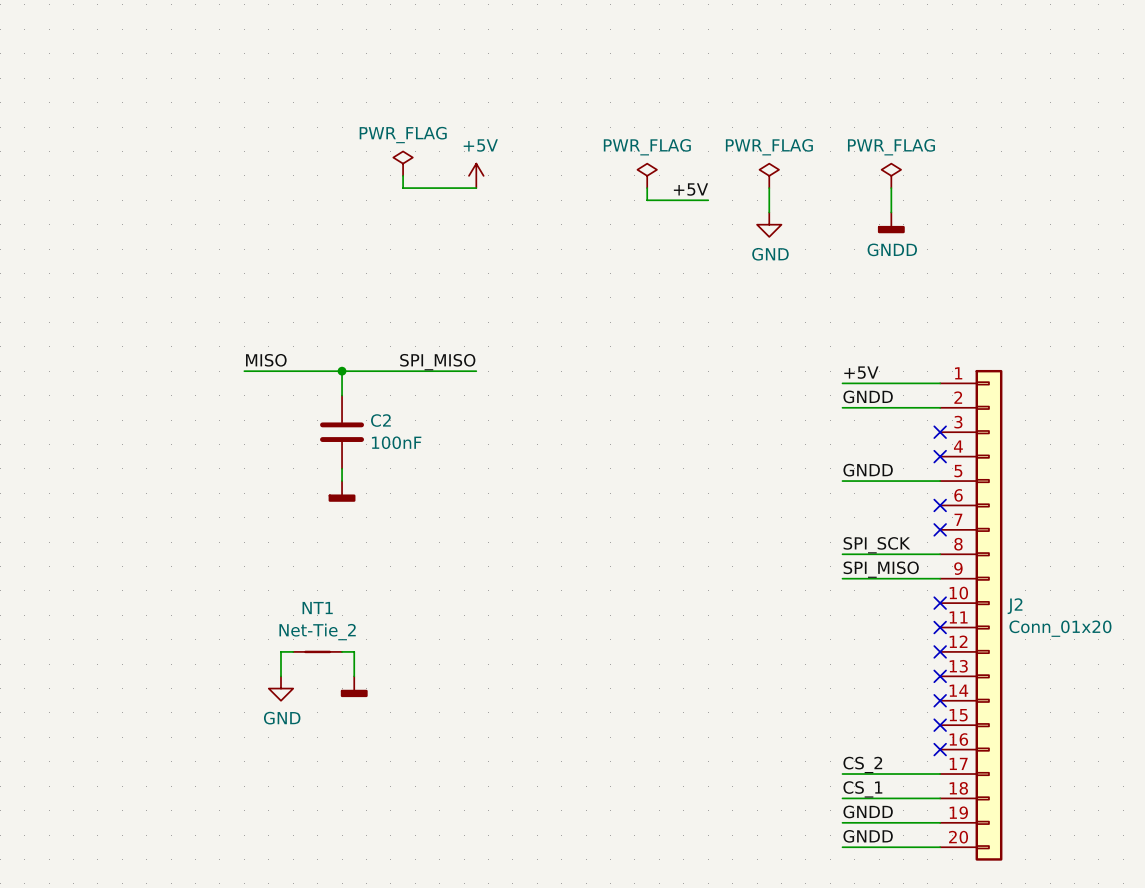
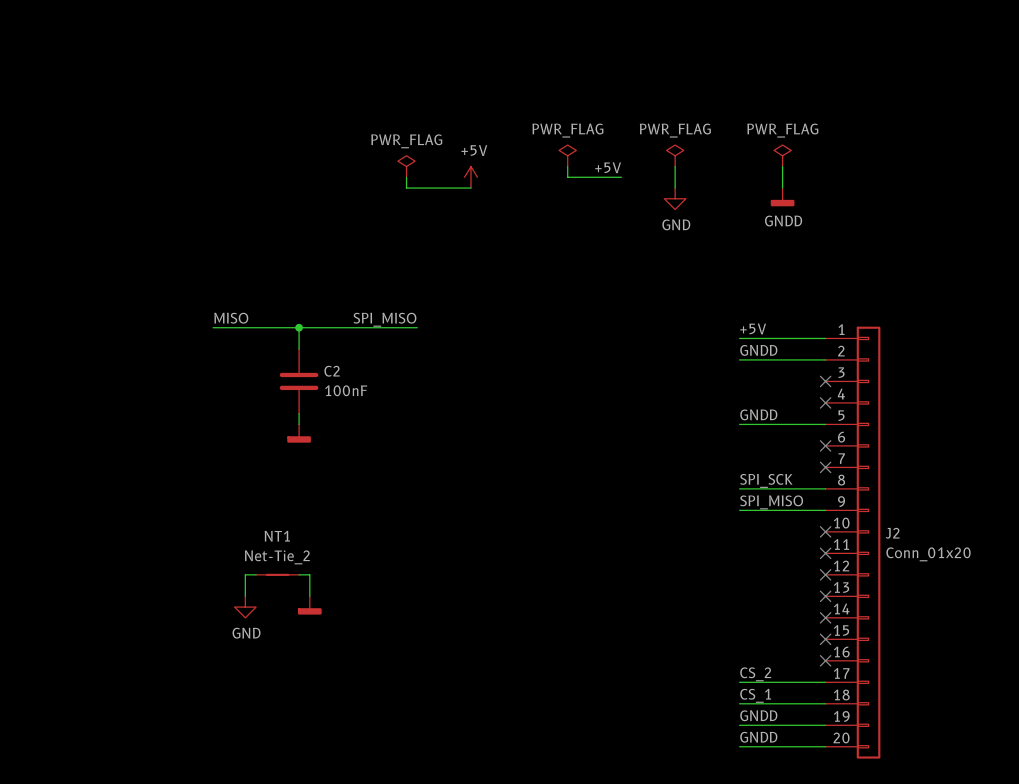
power symbol position: PWR_FLAG (403, 163) -> PWR_FLAG (406, 166)
wire: (403, 175) (403, 188) (476, 188) -> (406, 177) (406, 188) (470, 188)
power symbol position: +5V (476, 175) -> +5V (470, 177)

